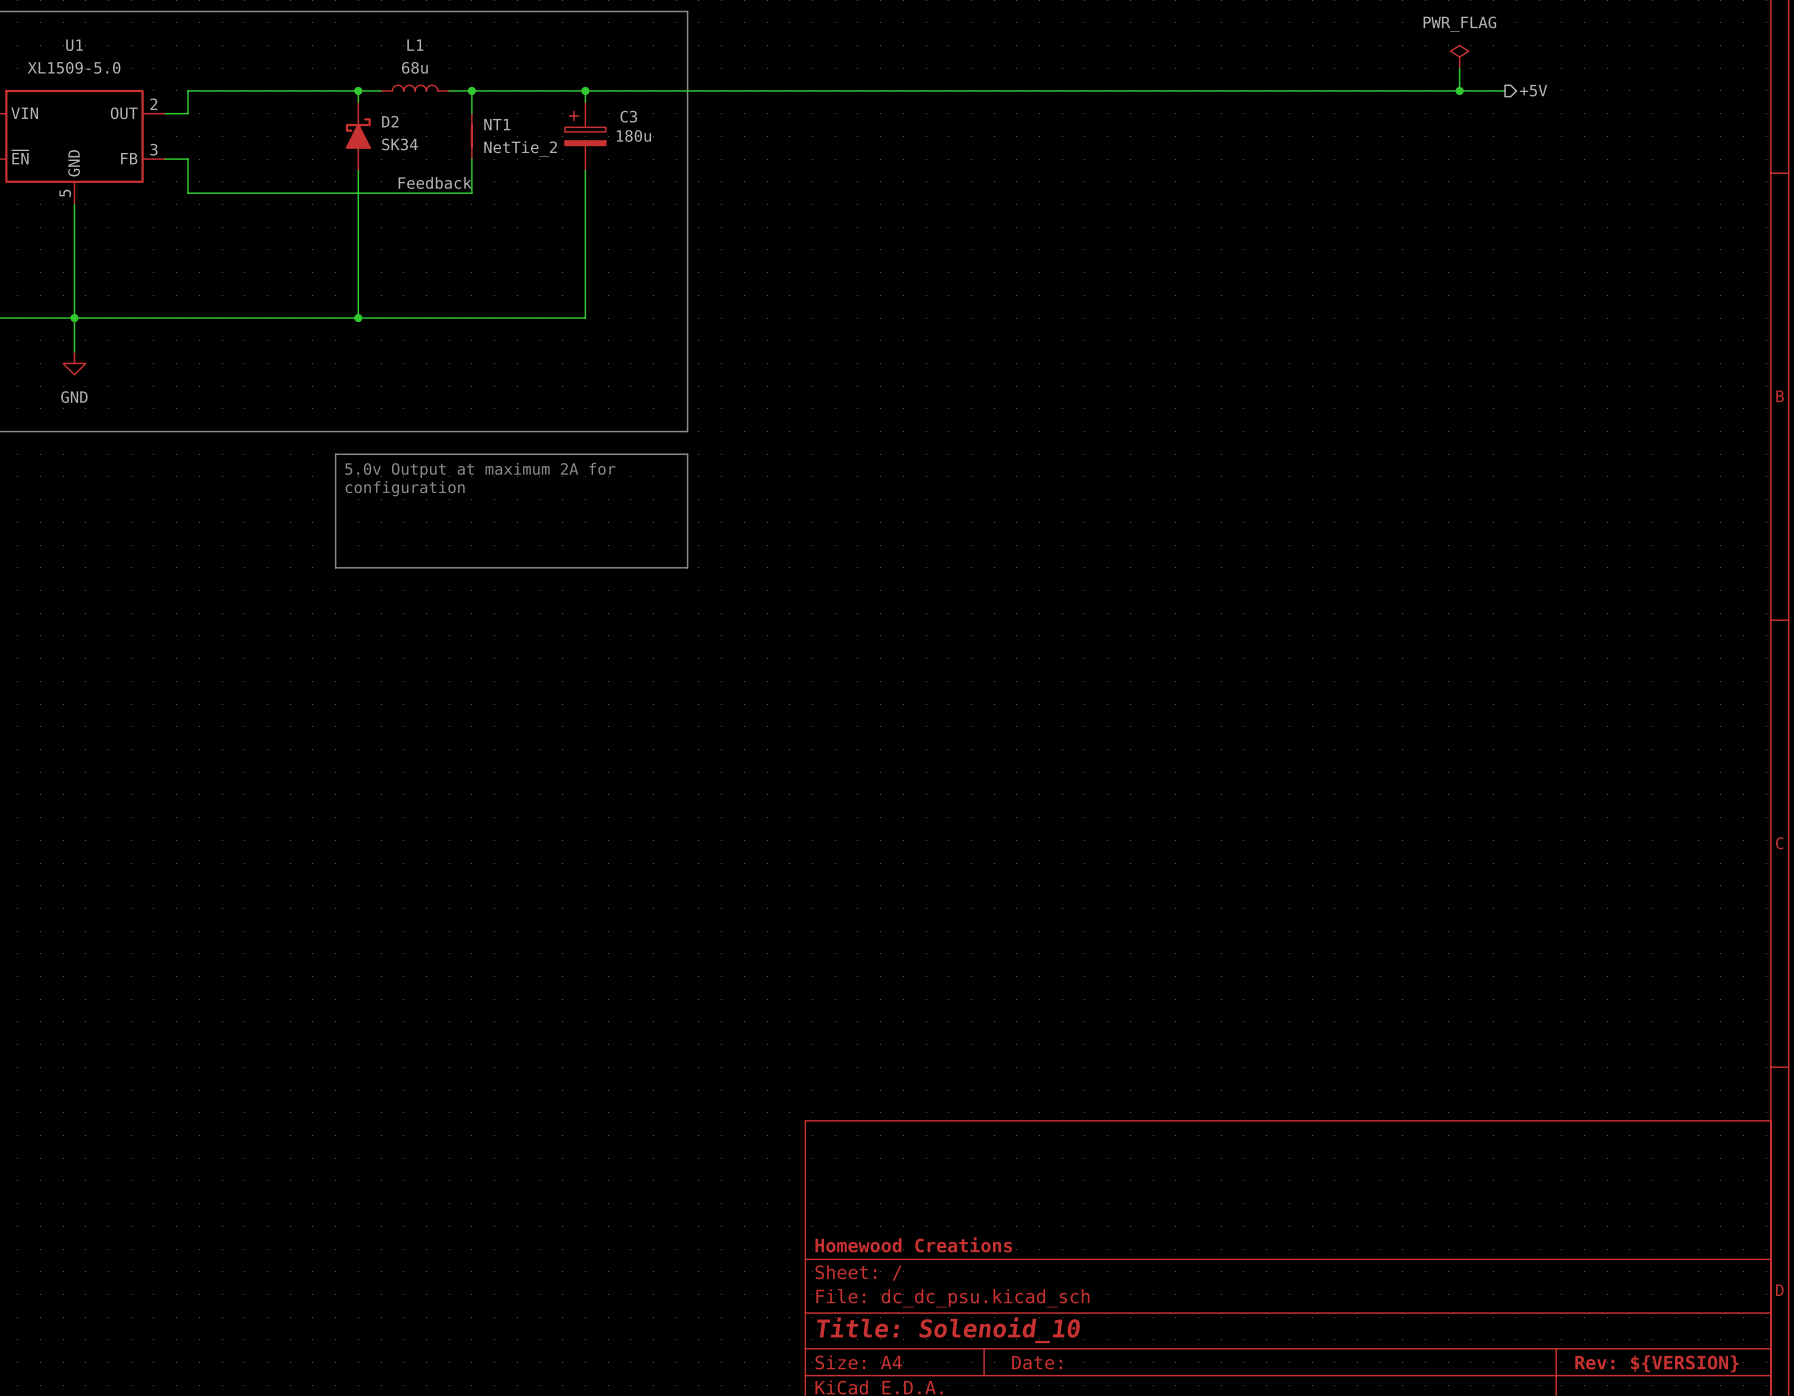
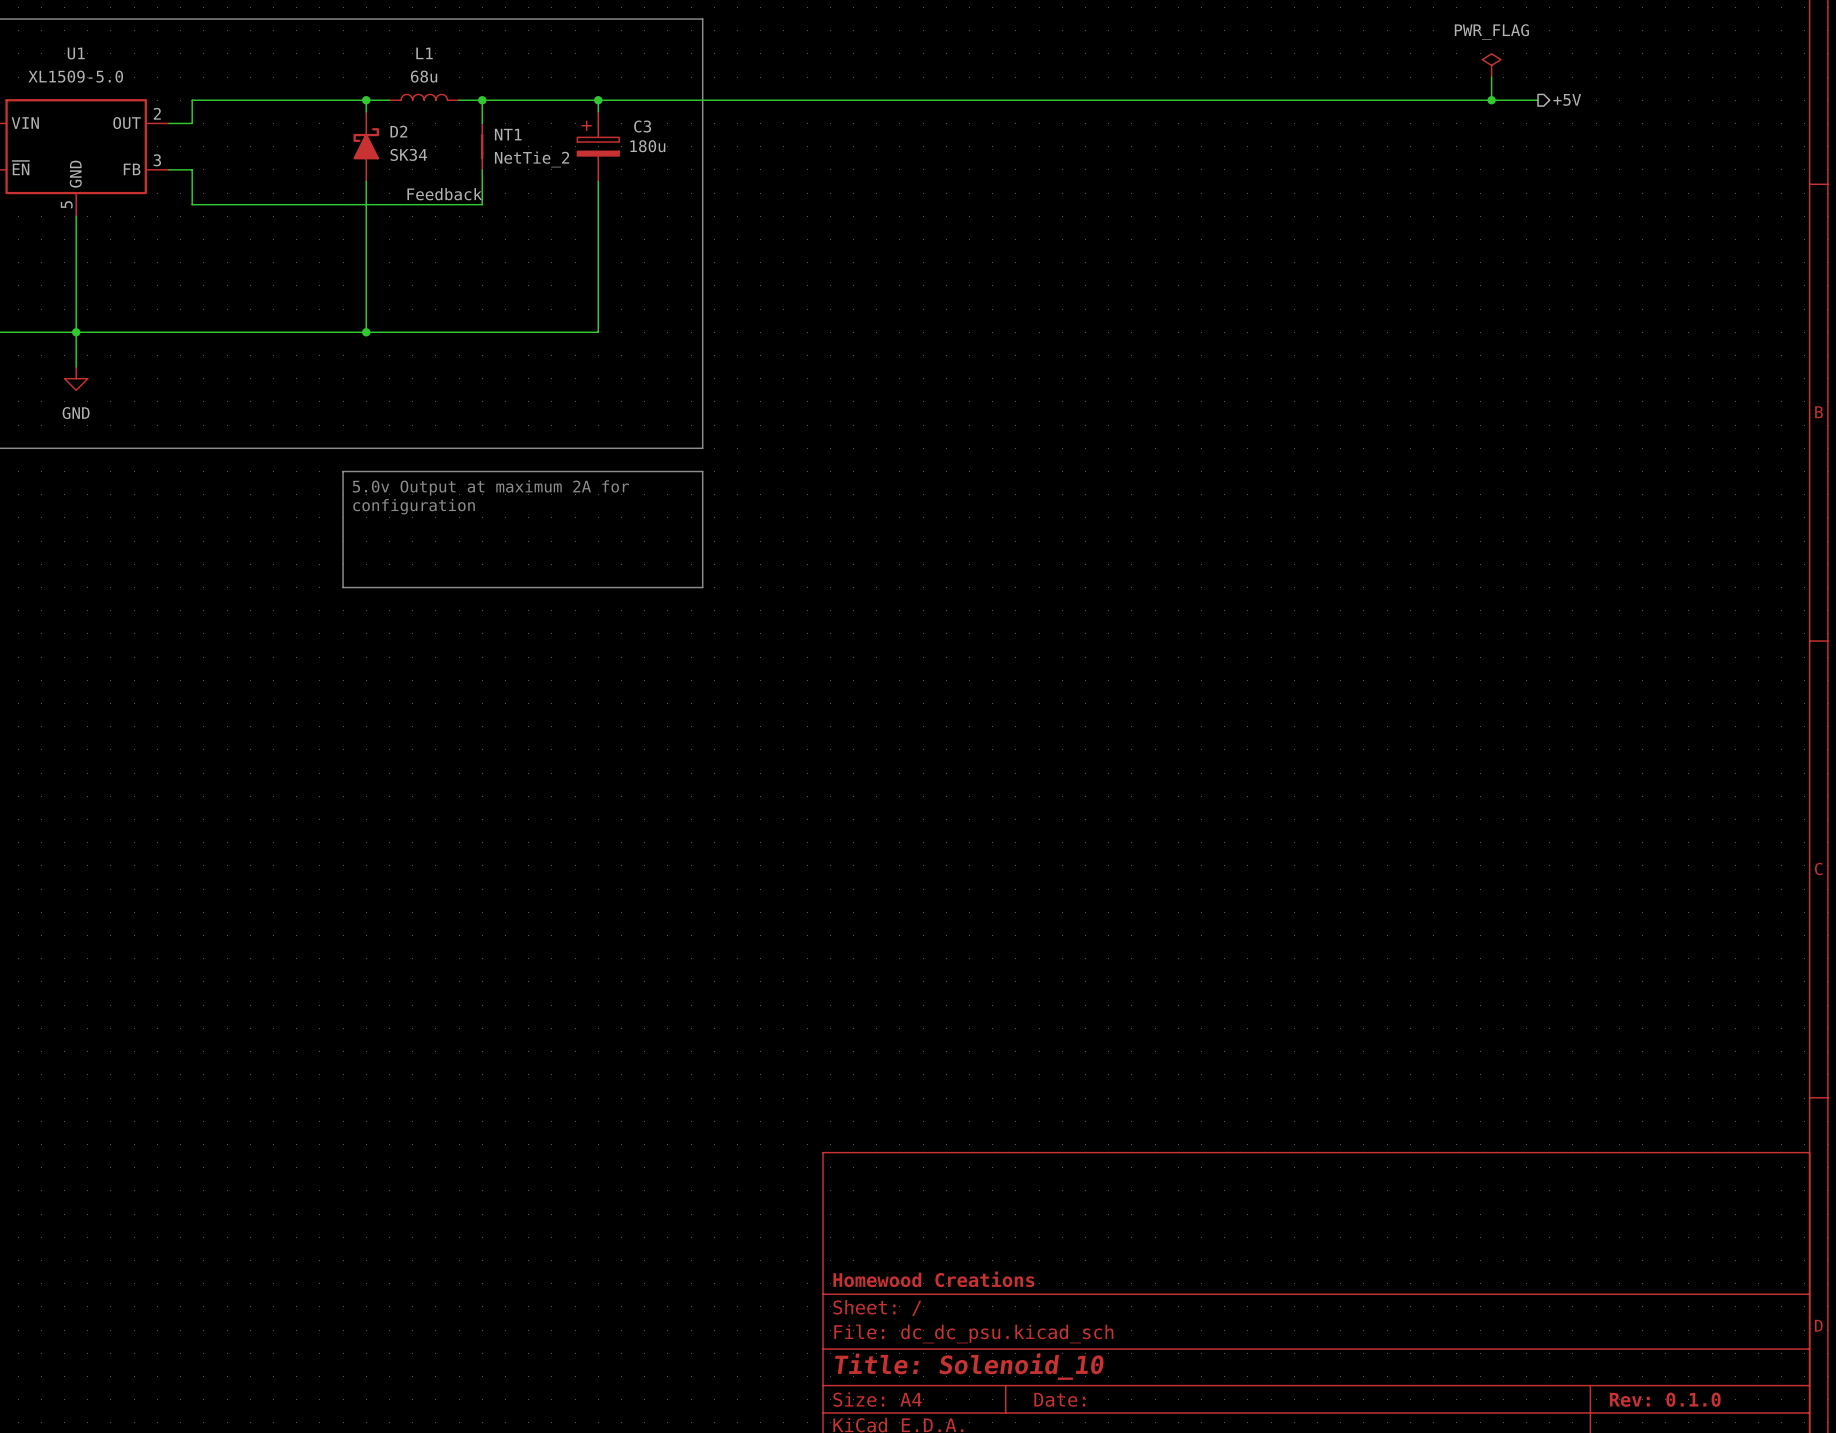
title block: Rev: ${VERSION} (1656, 1363) -> Rev: 0.1.0 (1665, 1399)

